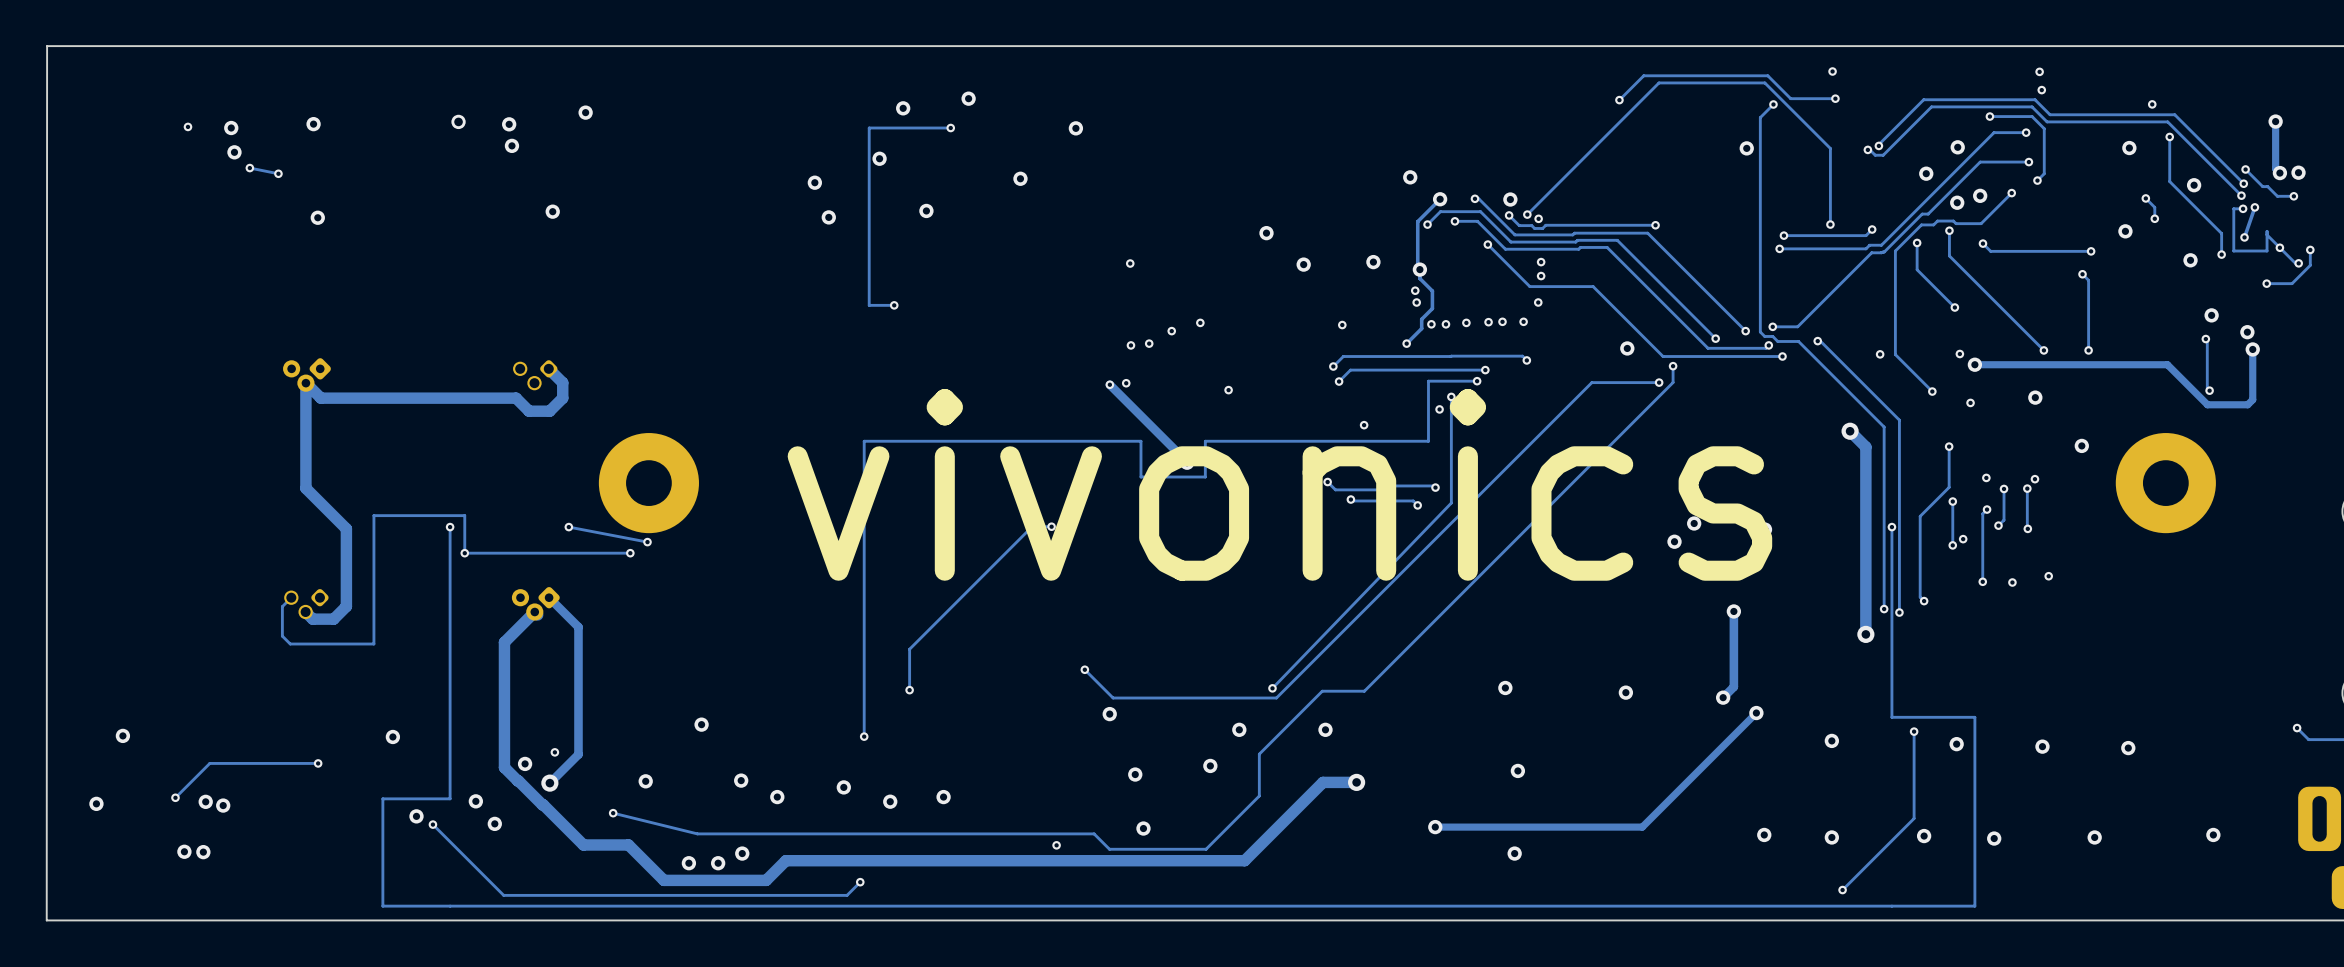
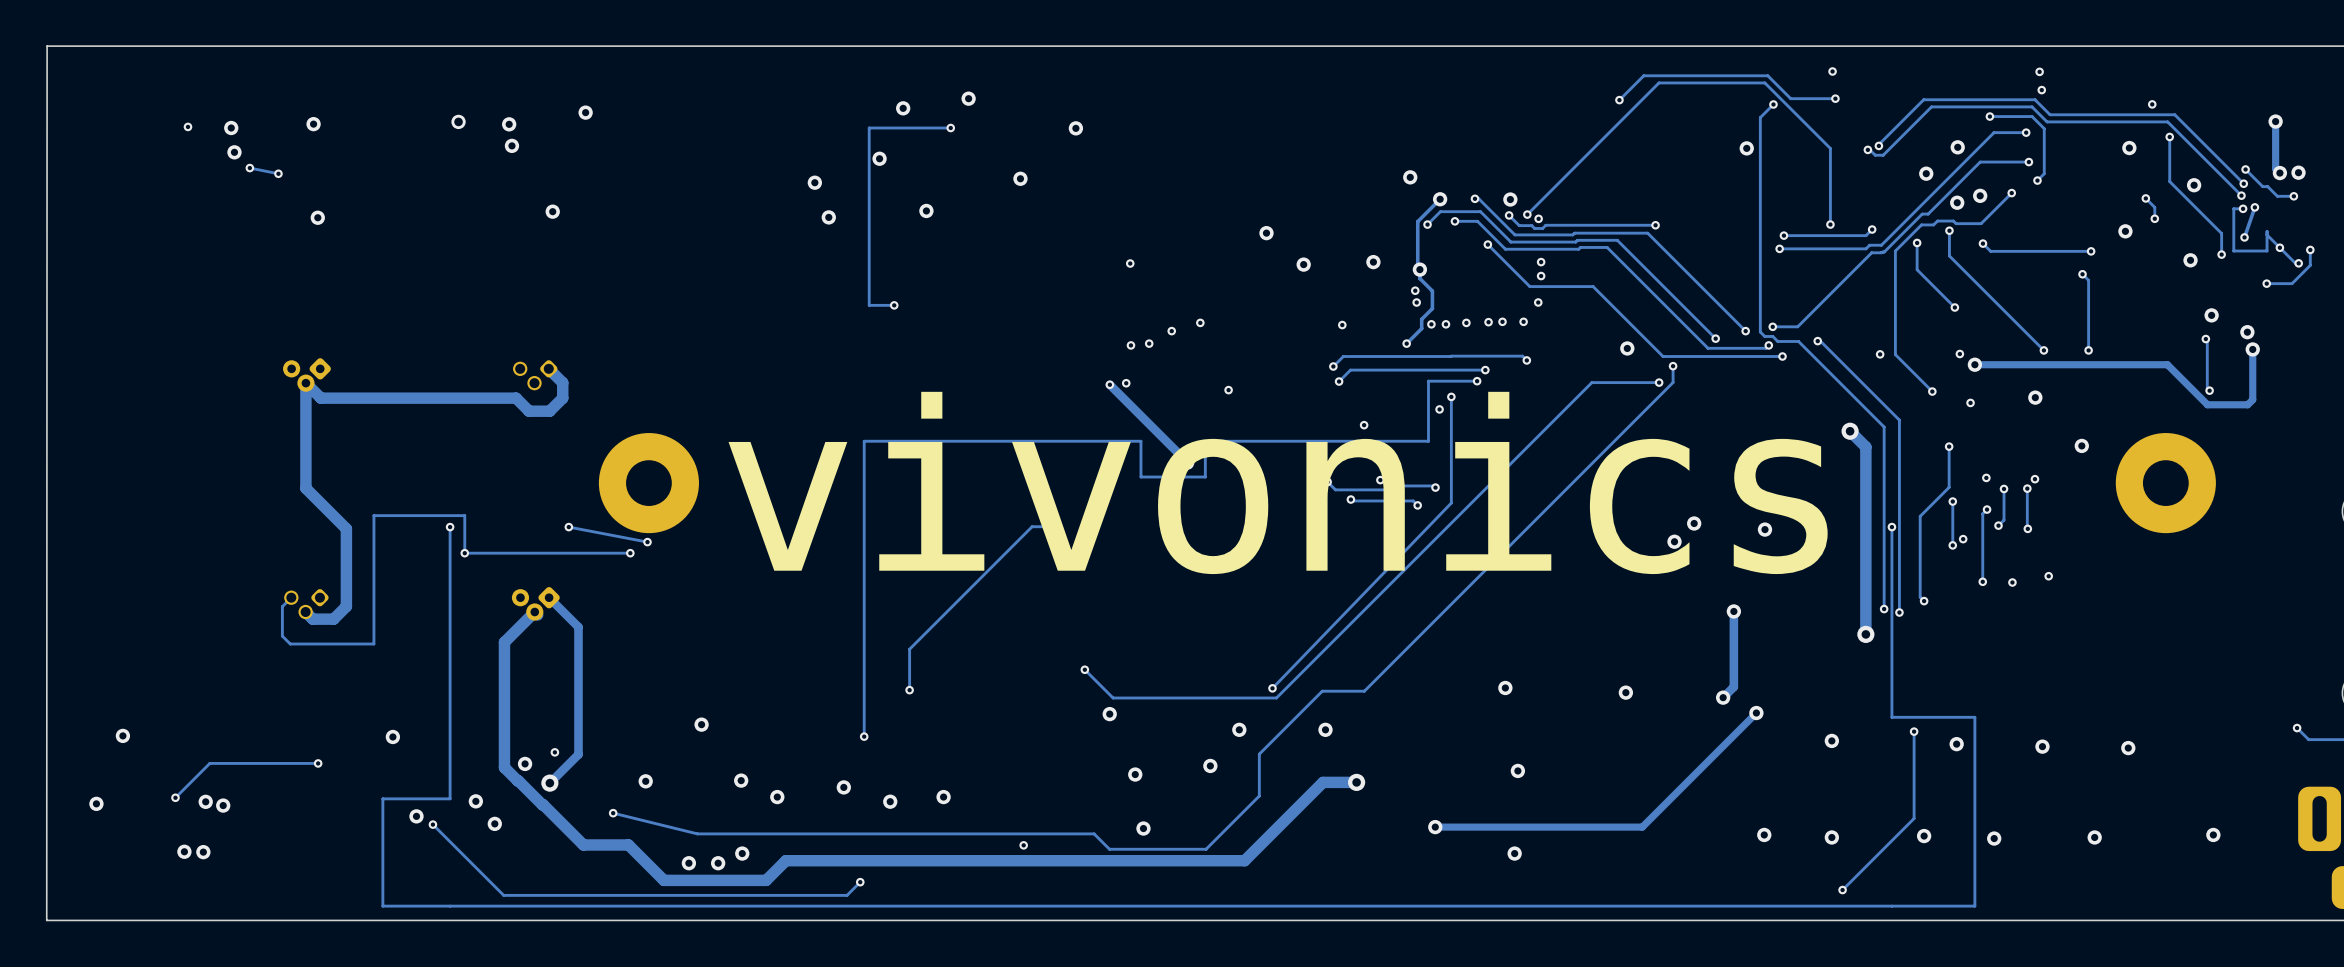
via position: (1056, 845) -> (1023, 845)

